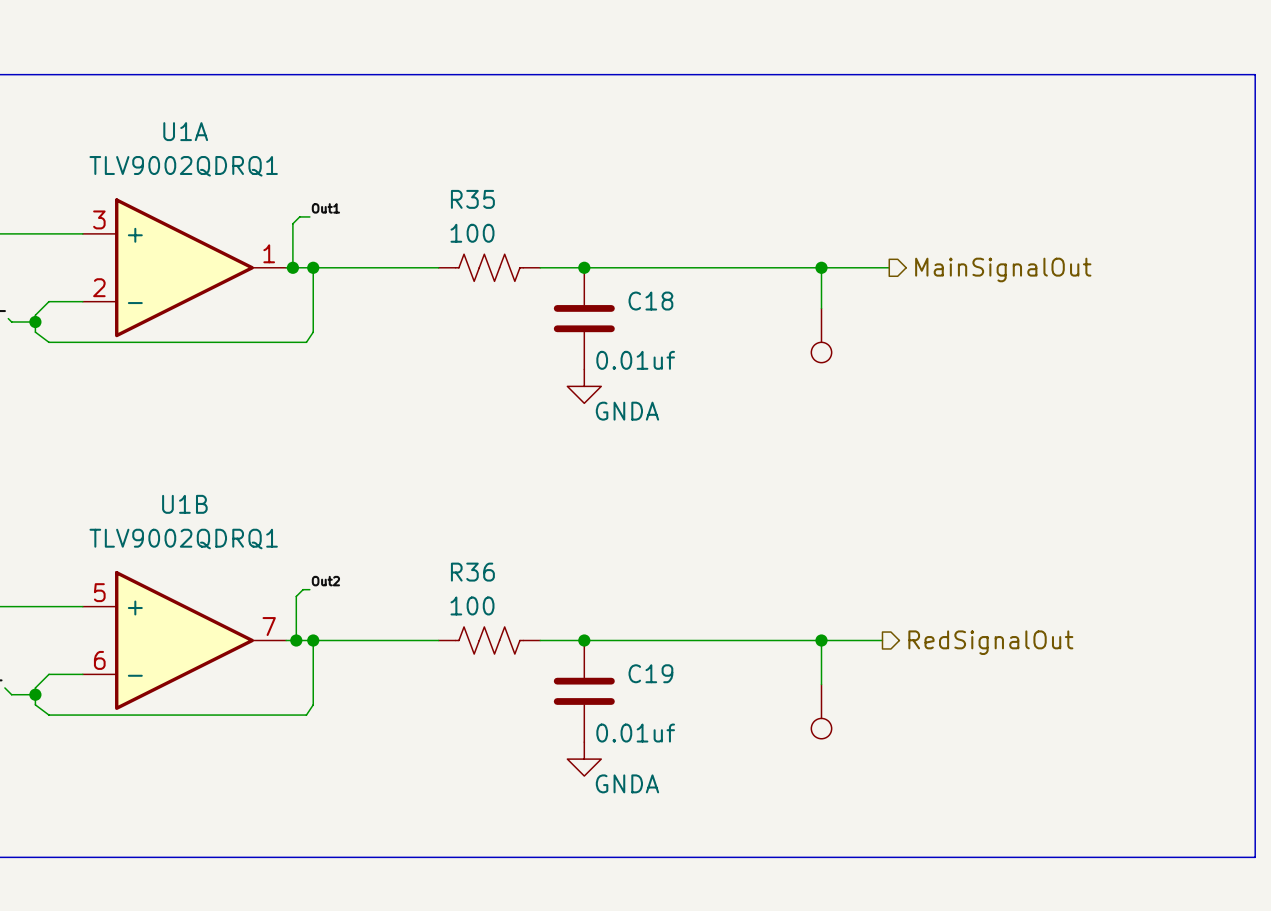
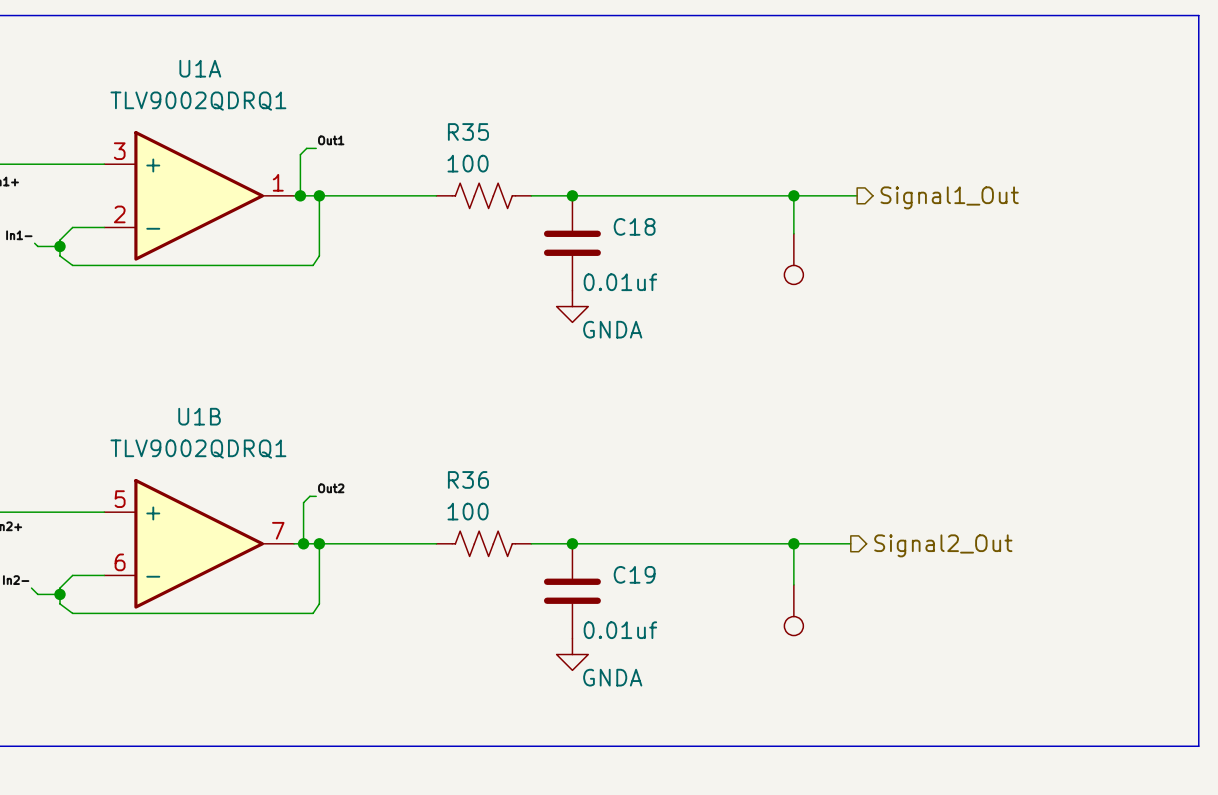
hierarchical label: MainSignalOut (1003, 269) -> Signal1_Out (949, 197)
hierarchical label: RedSignalOut (990, 642) -> Signal2_Out (943, 545)

